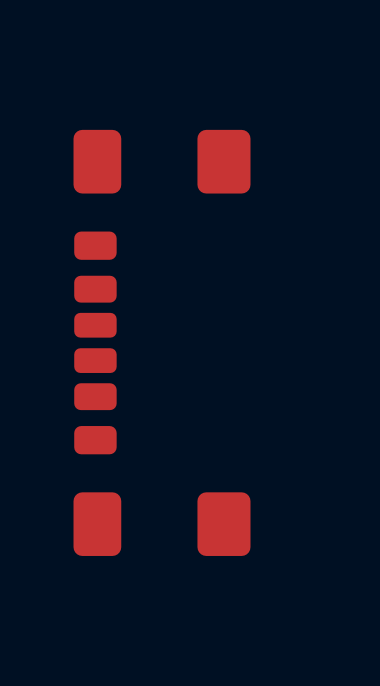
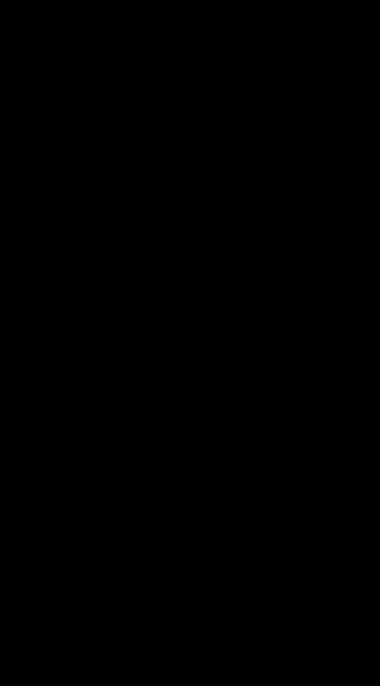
part: (162, 342) -> none

